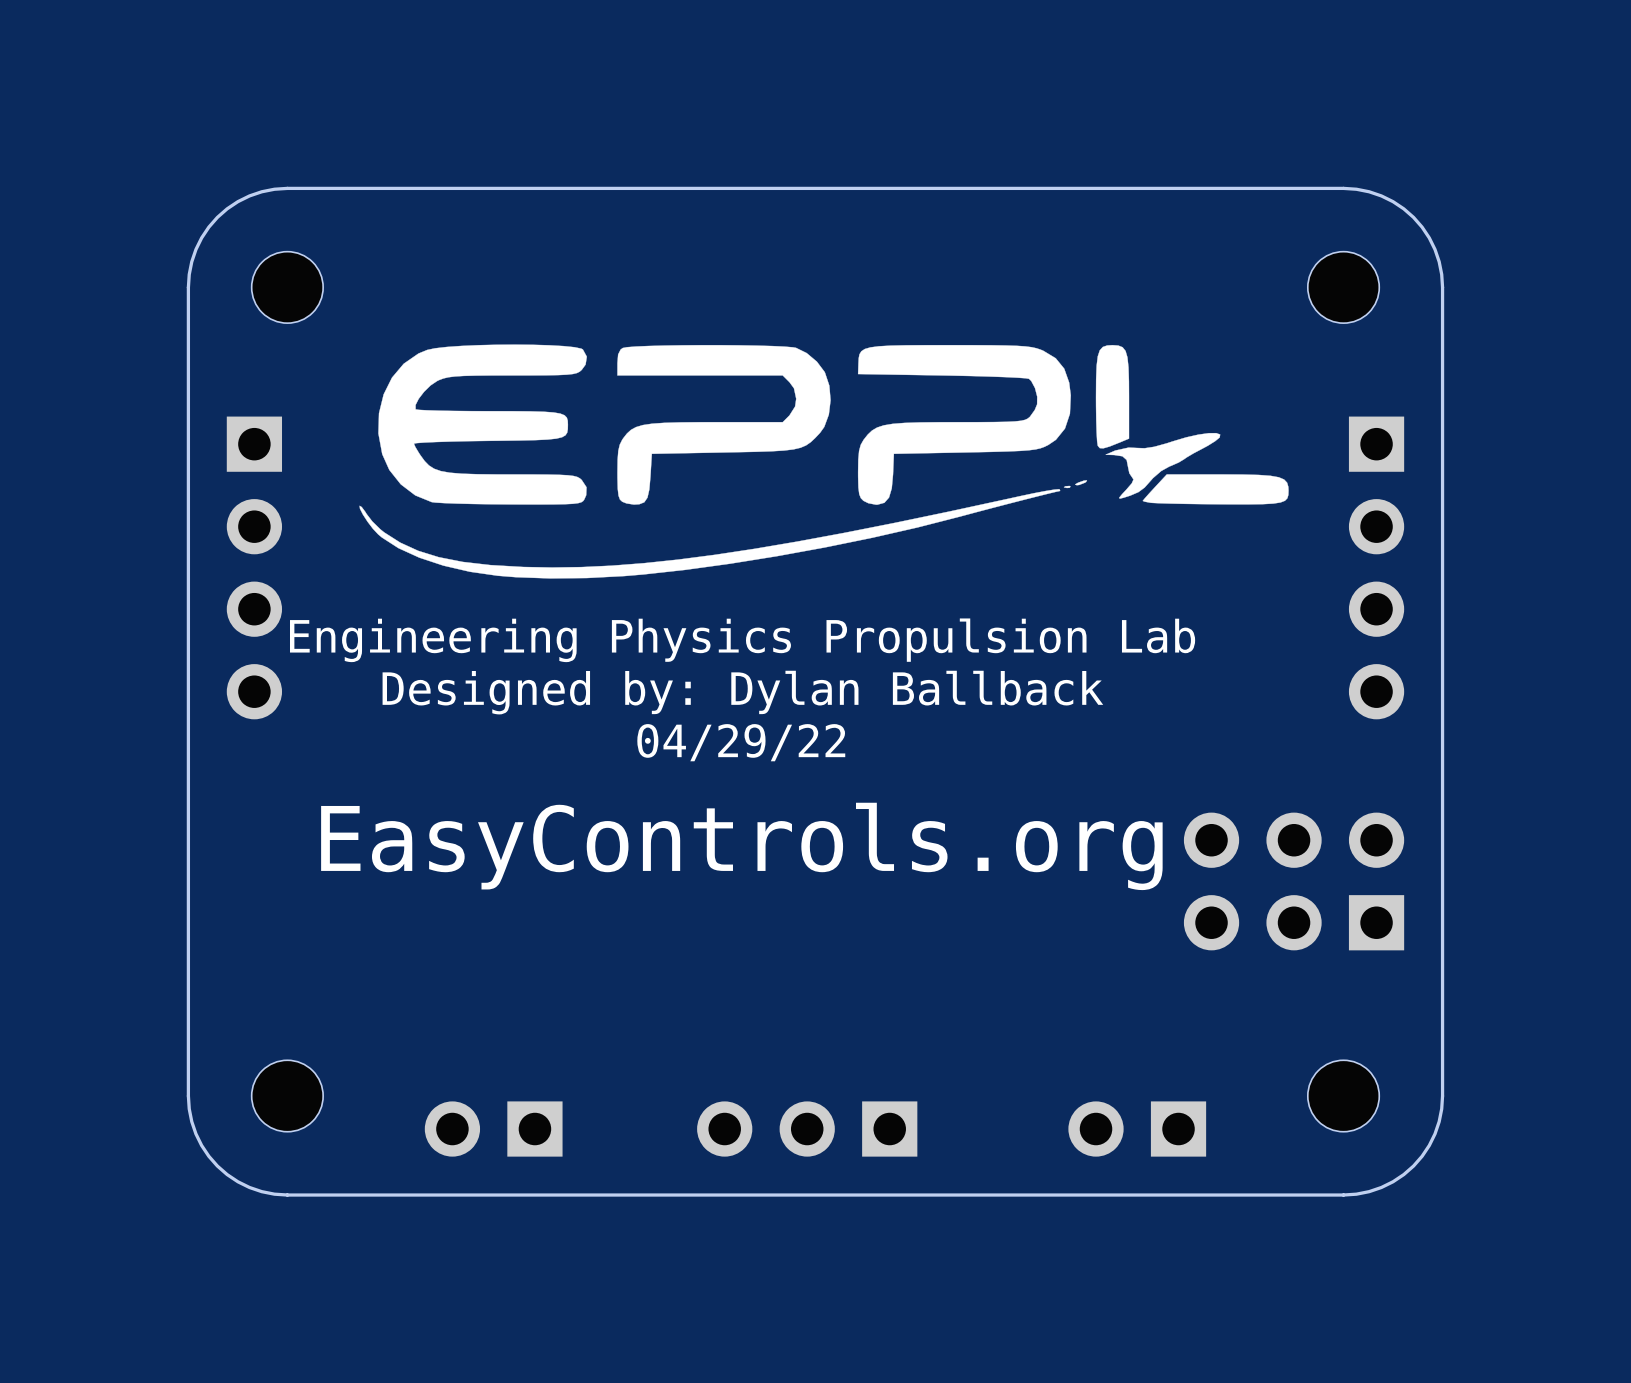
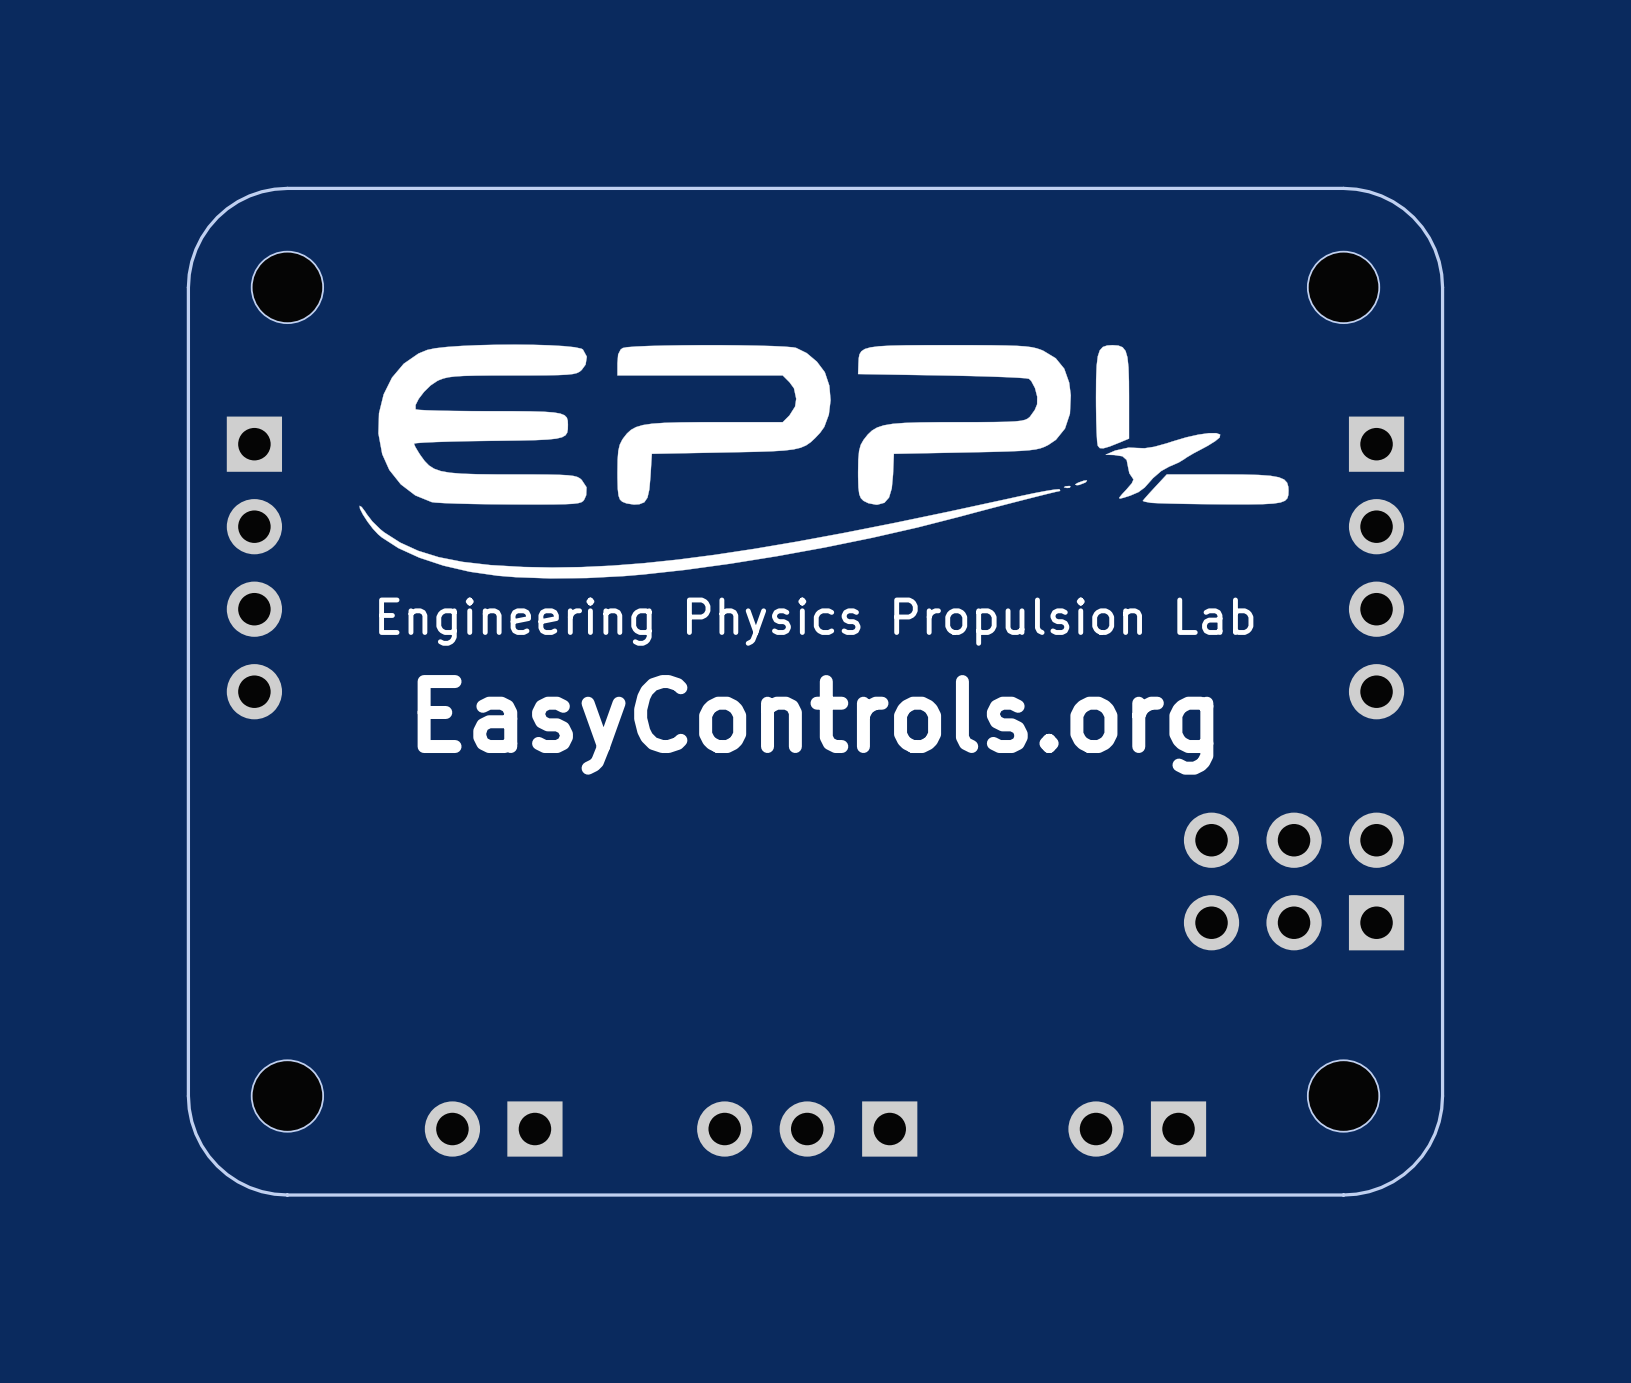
text position: Engineering Physics Propulsion Lab (742, 640) -> Engineering Physics Propulsion Lab (816, 621)
text: Designed by: Dylan Ballback (742, 692) -> none
text: 04/29/22 (741, 742) -> none
text position: EasyControls.org (741, 846) -> EasyControls.org (815, 724)

